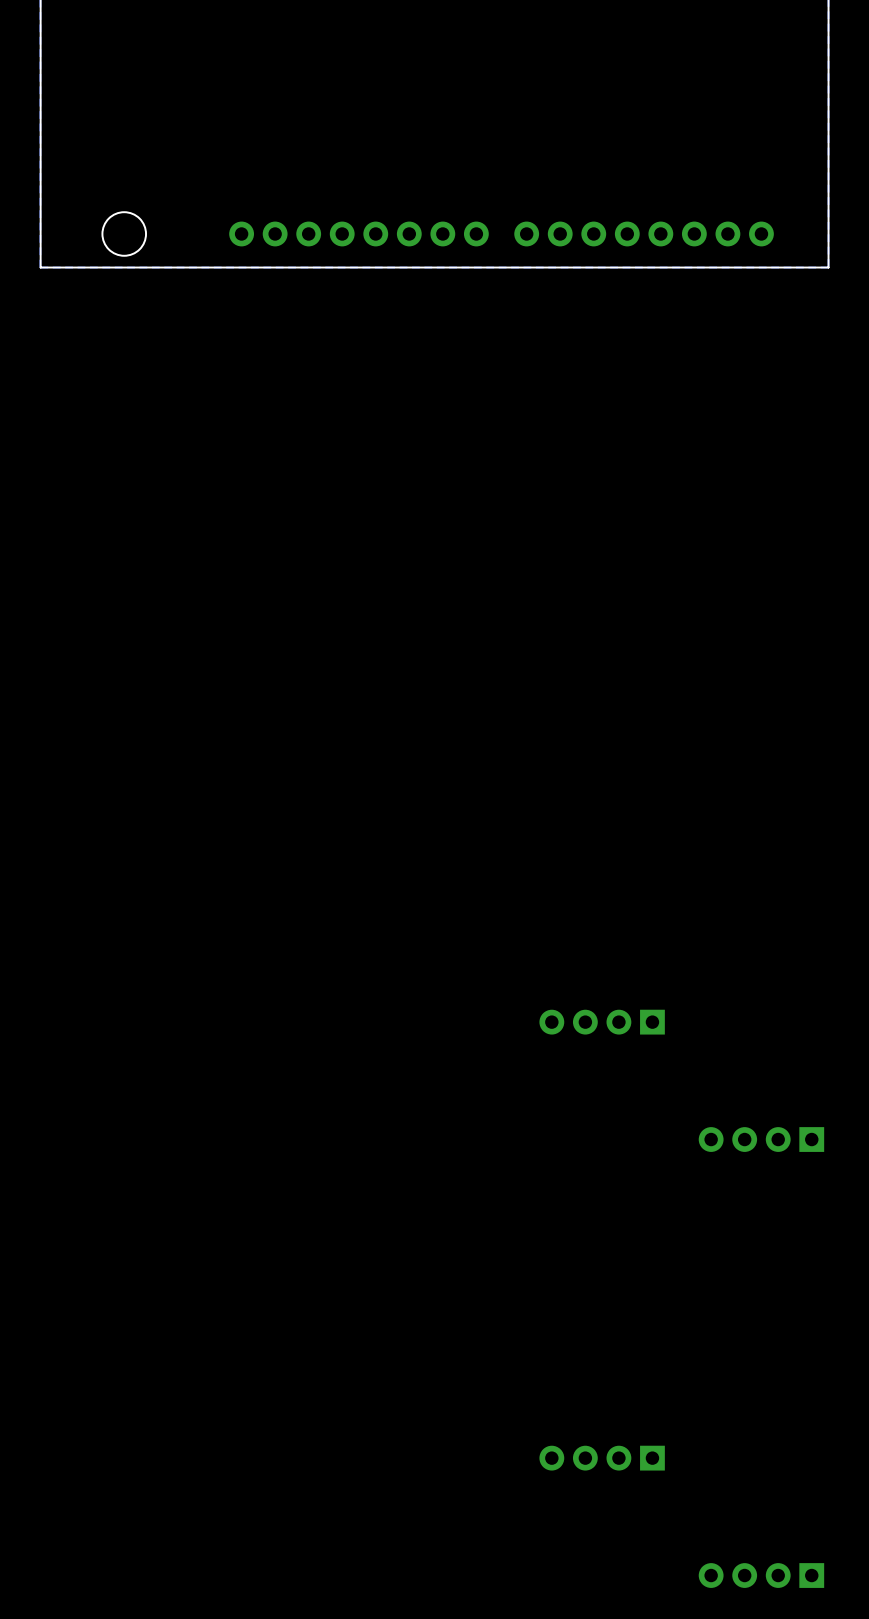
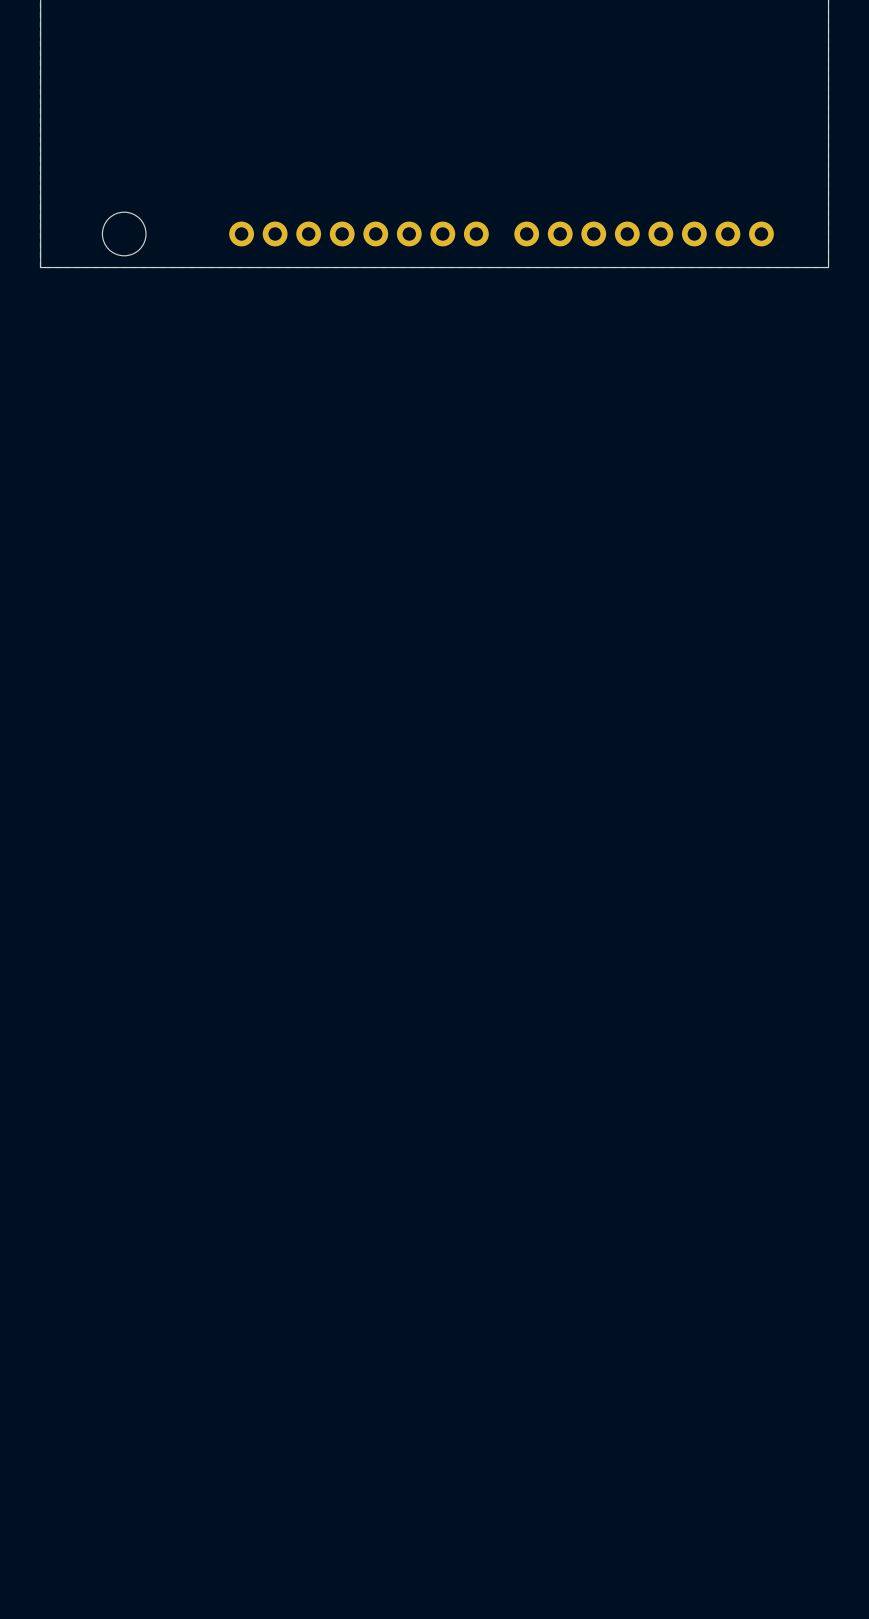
part: (602, 1022) -> none
part: (761, 1139) -> none
part: (602, 1458) -> none
part: (761, 1575) -> none

